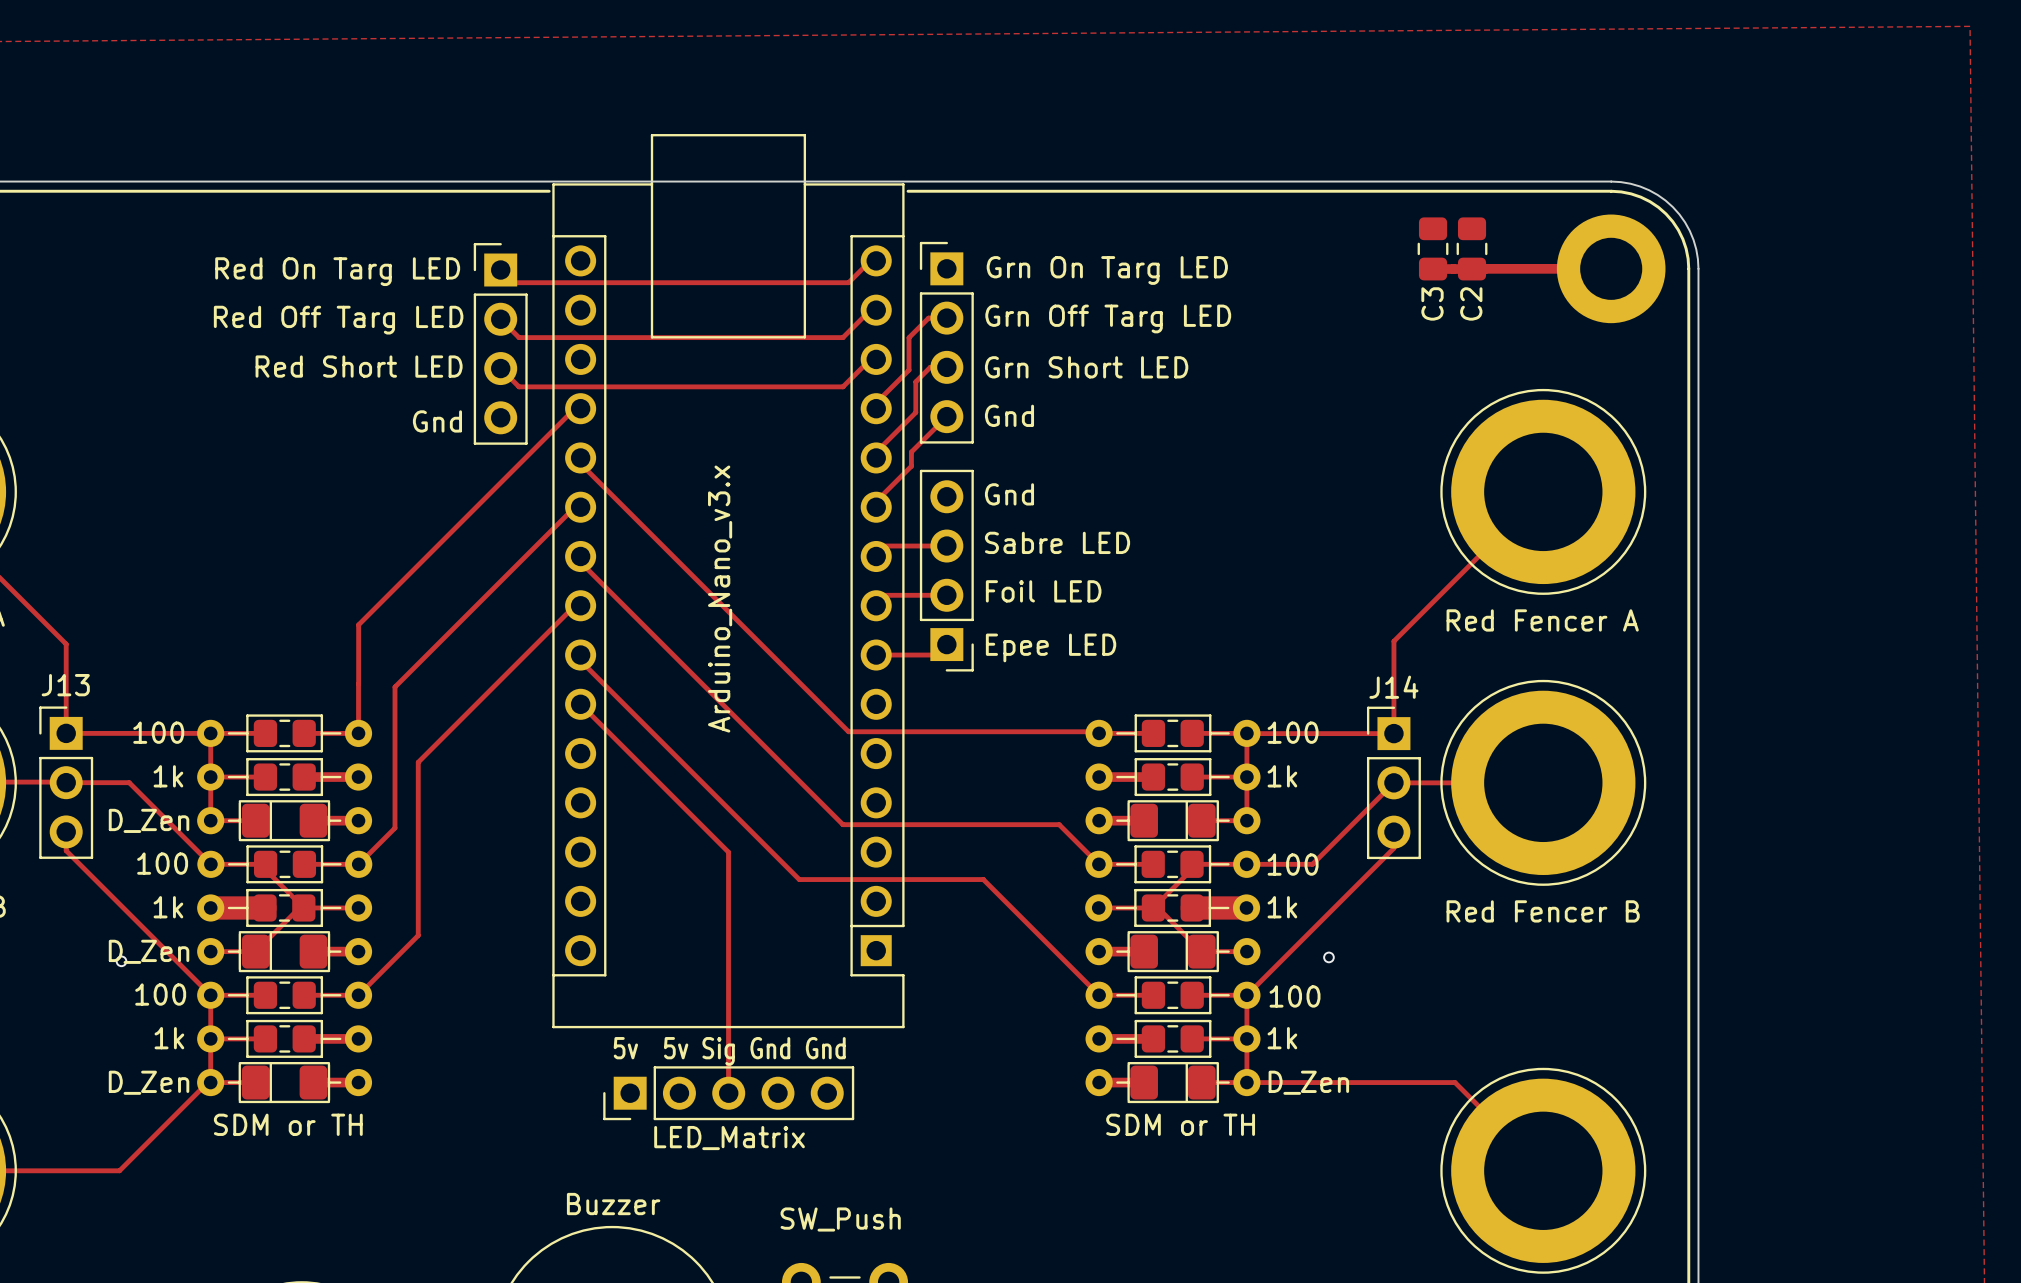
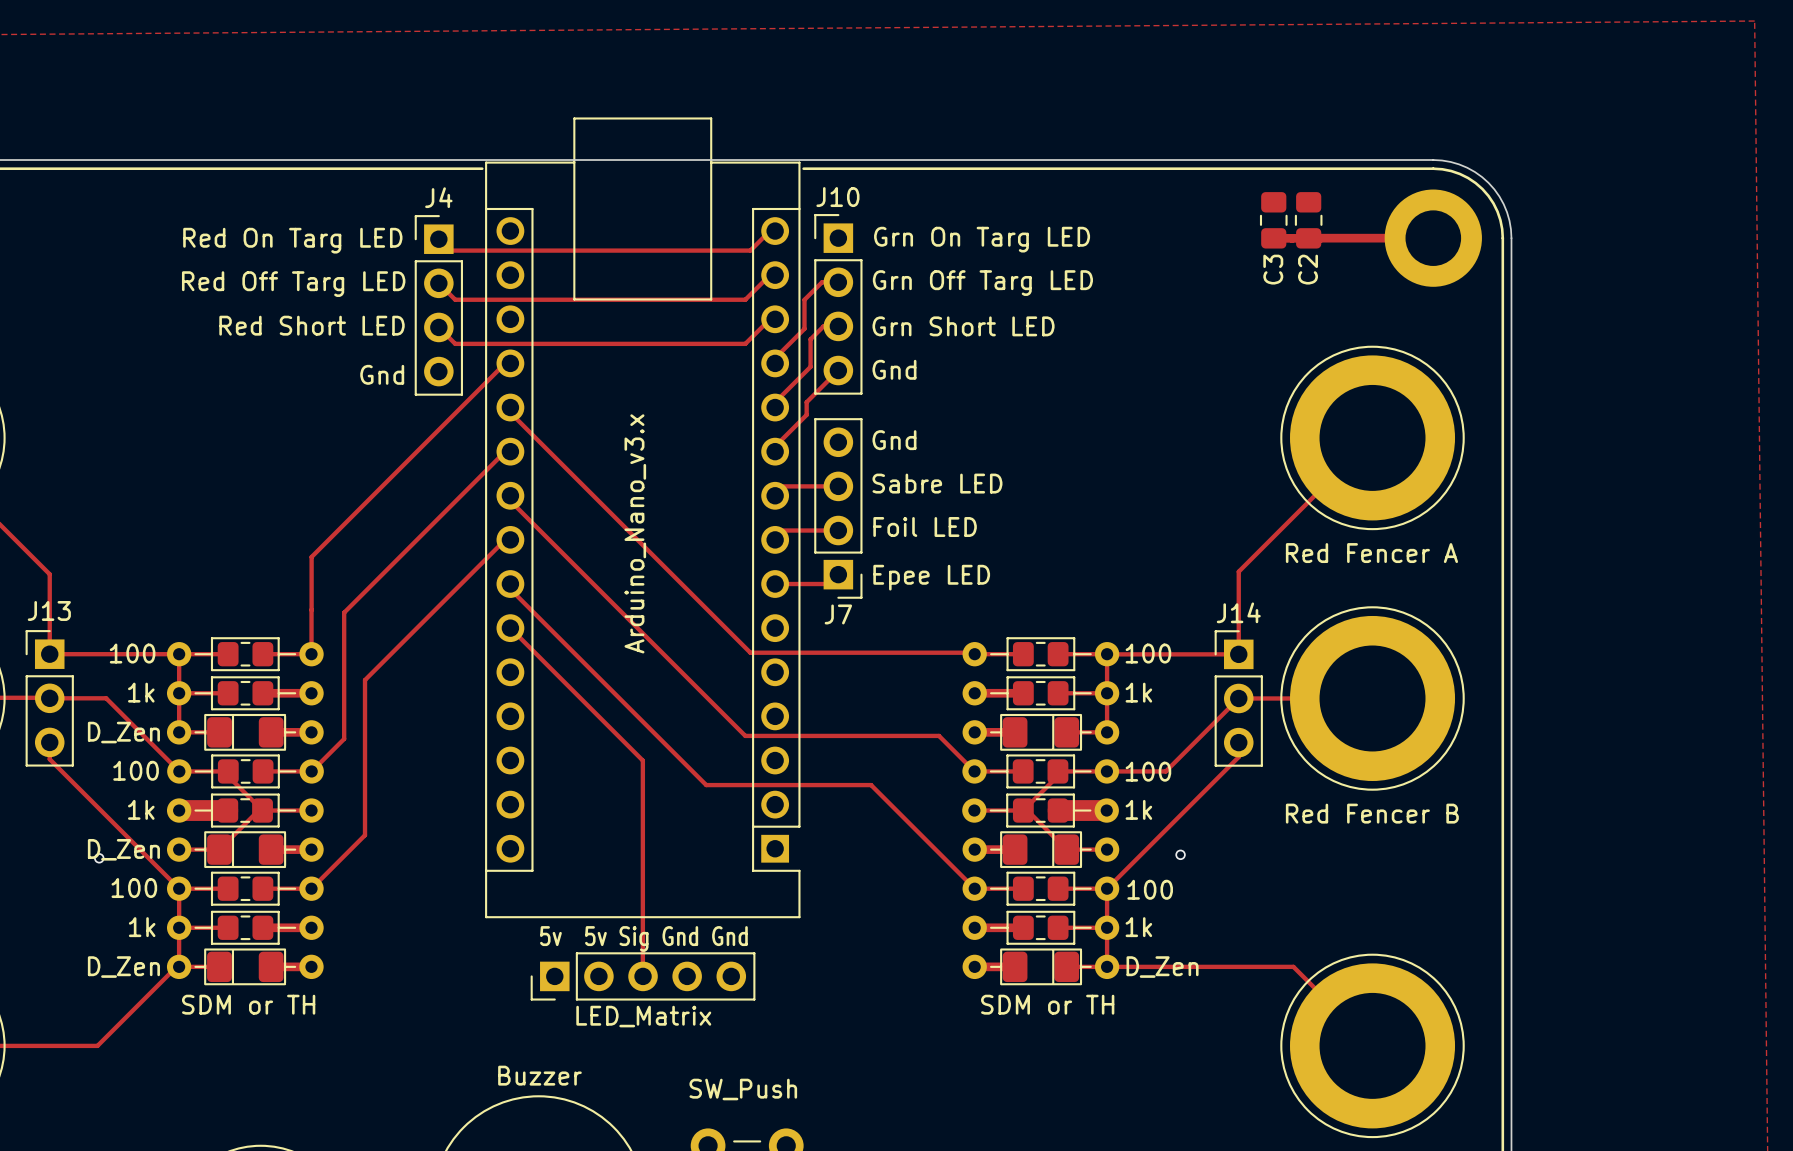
J10 name: none -> J10 (837, 197)
J4 name: none -> J4 (438, 197)
J7 name: none -> J7 (838, 614)

